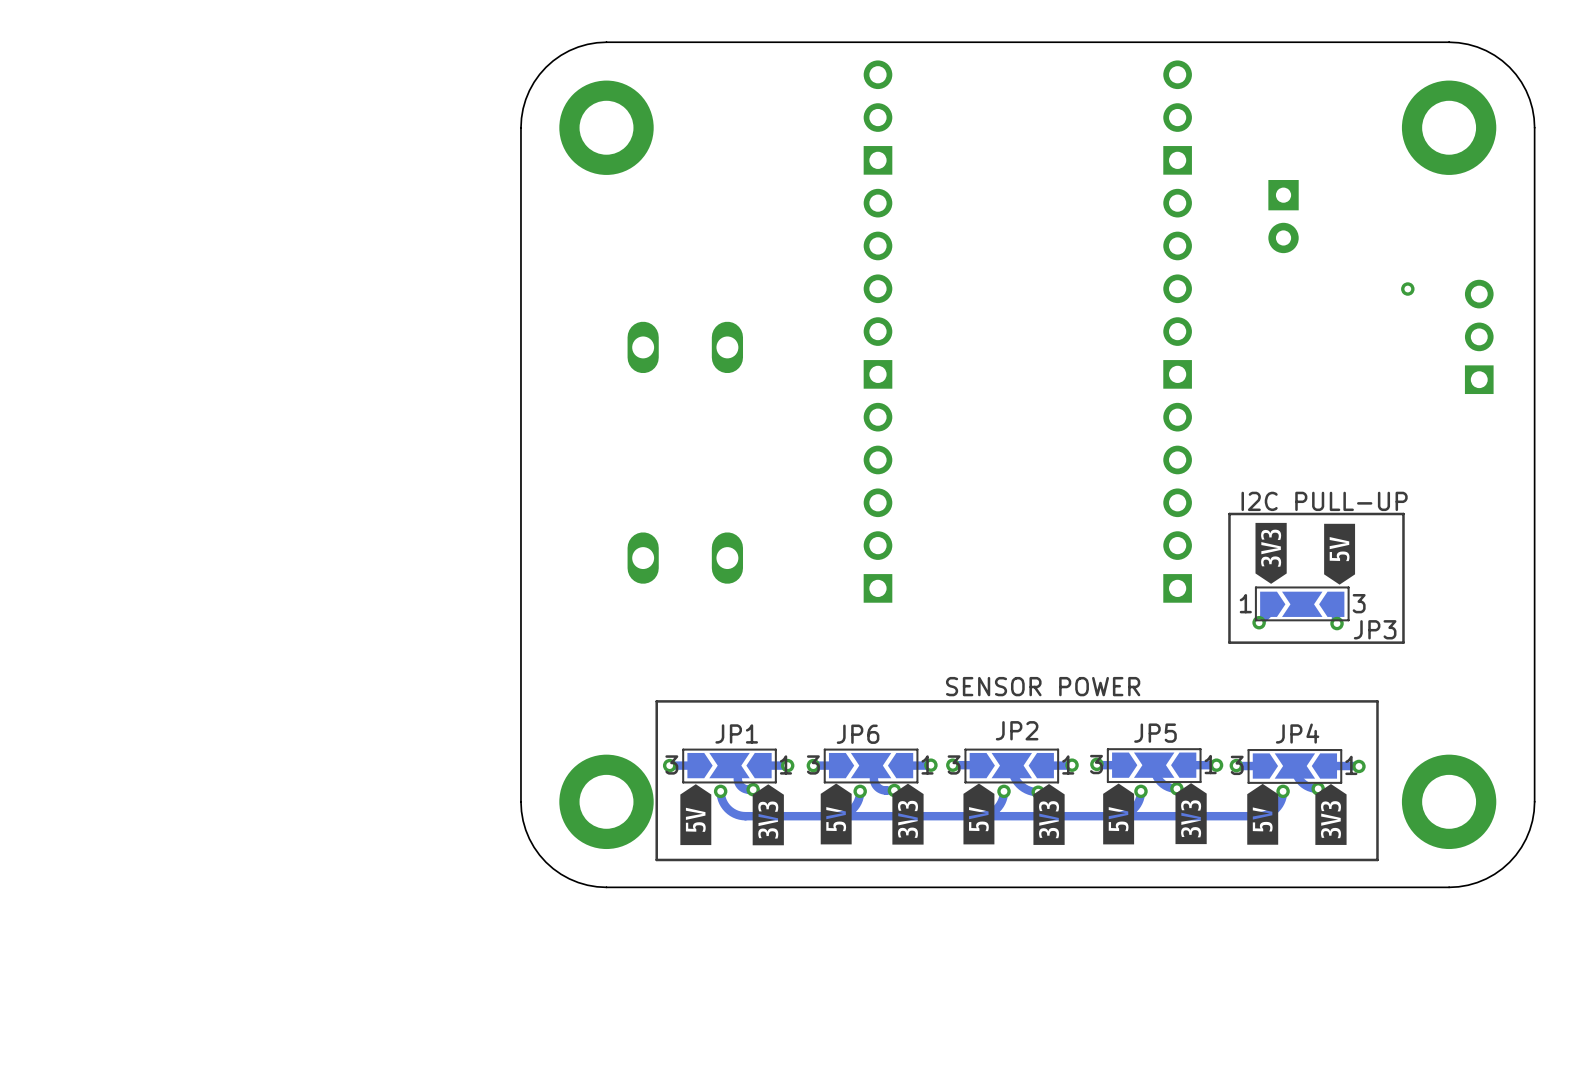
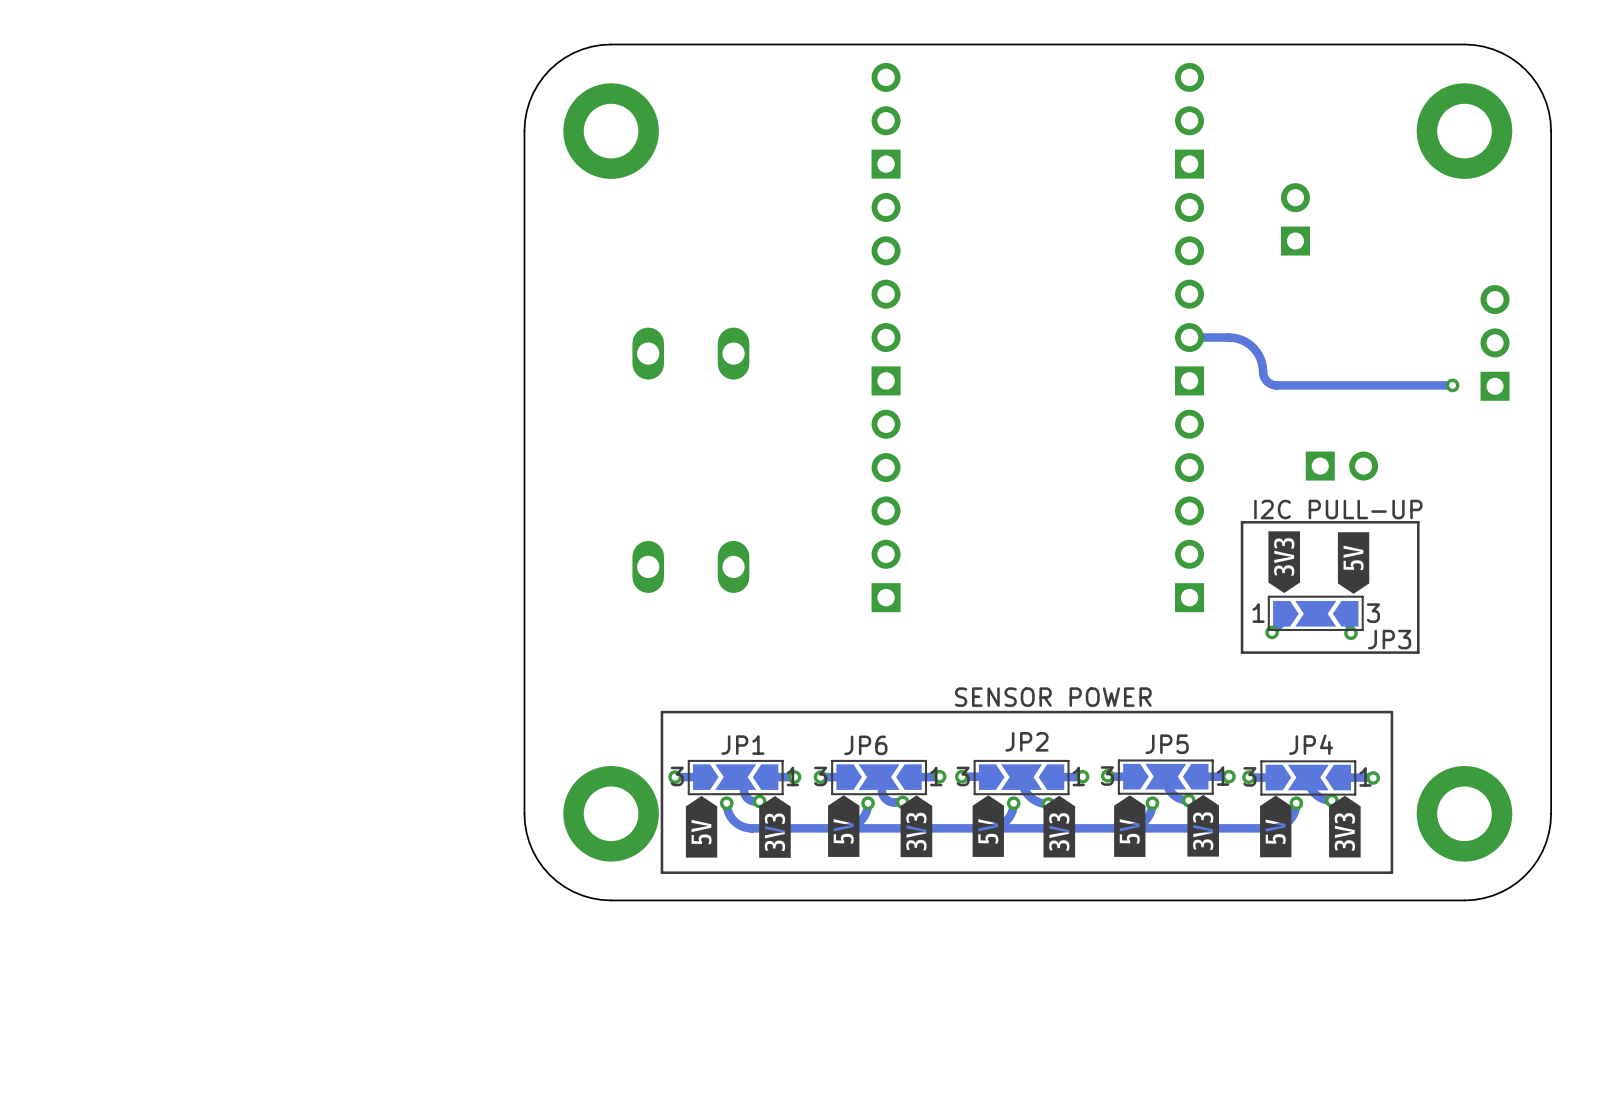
part footprint: [1268, 180, 1299, 254] -> [1280, 183, 1310, 256]
via position: (1407, 289) -> (1452, 385)
track: none -> (1189, 337) (1233, 337) (1245, 342) (1258, 354) (1265, 380) (1274, 385) (1452, 385)
part: none -> (1341, 466)

